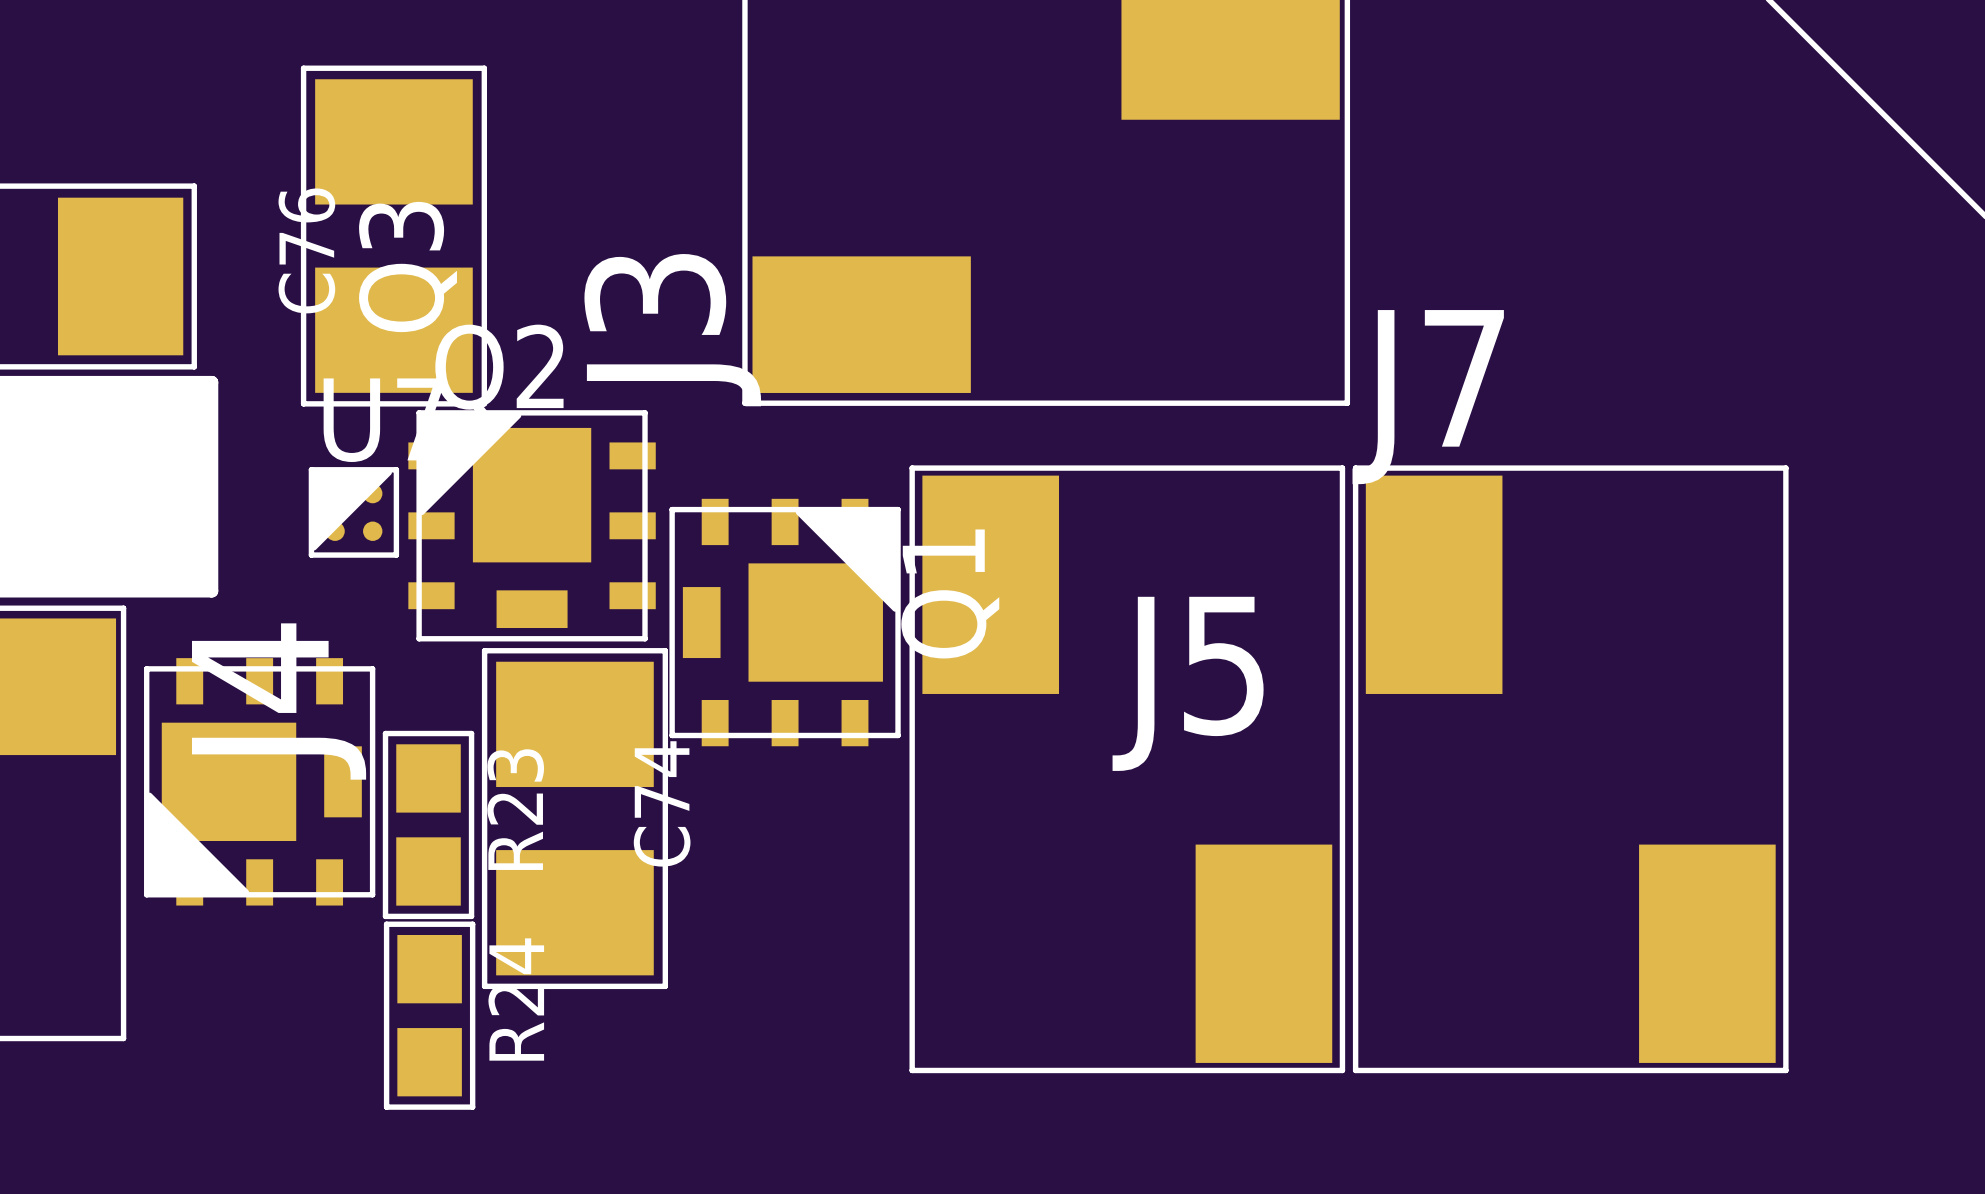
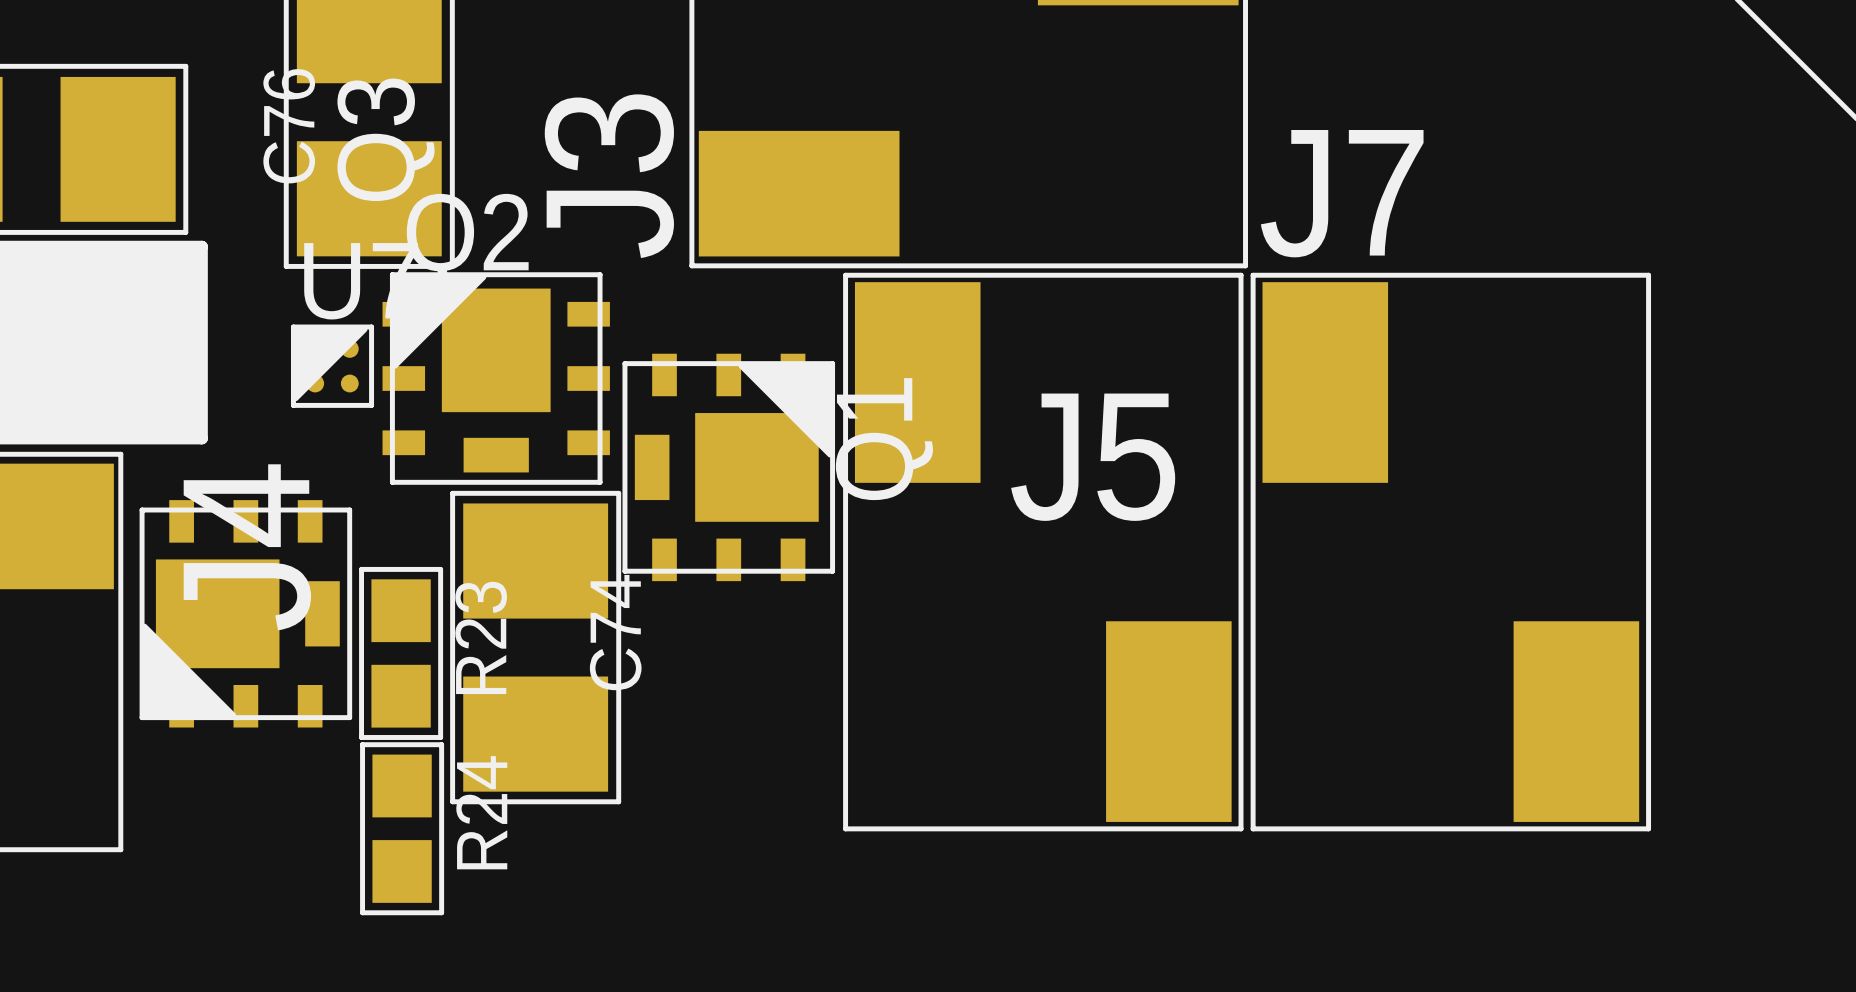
J5 position: (1127, 769) -> (1043, 552)
J7 position: (1570, 769) -> (1450, 552)

